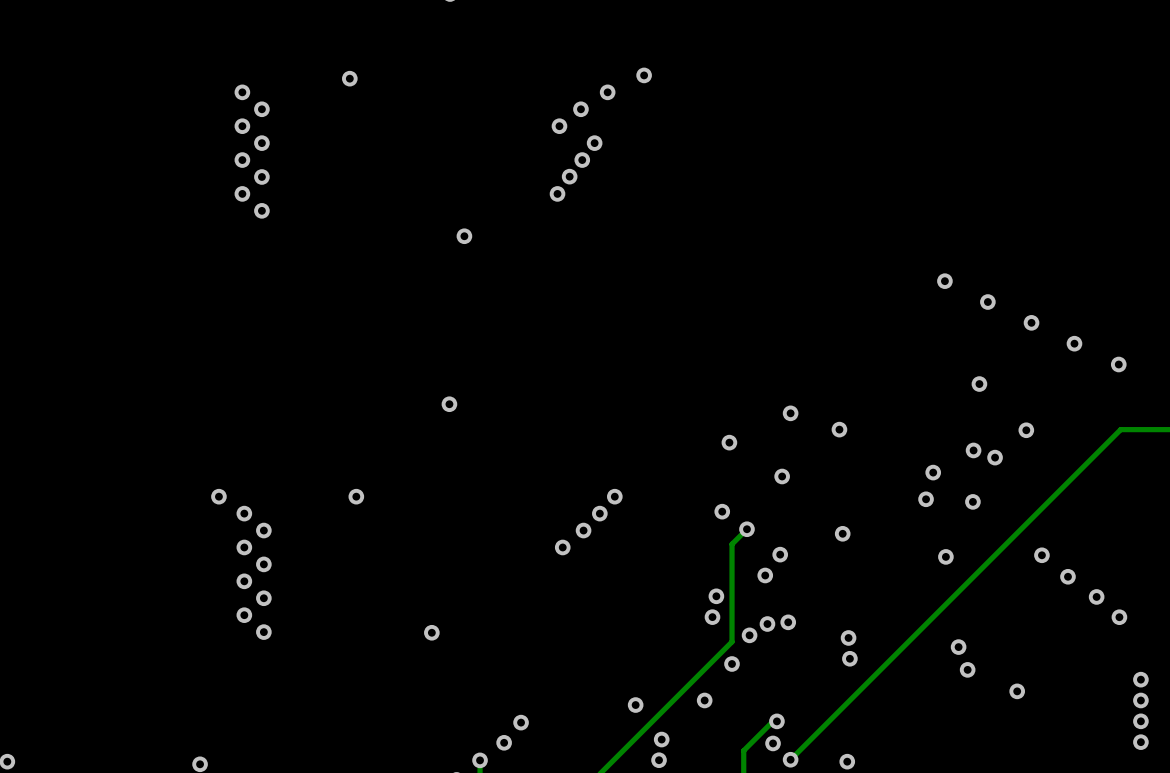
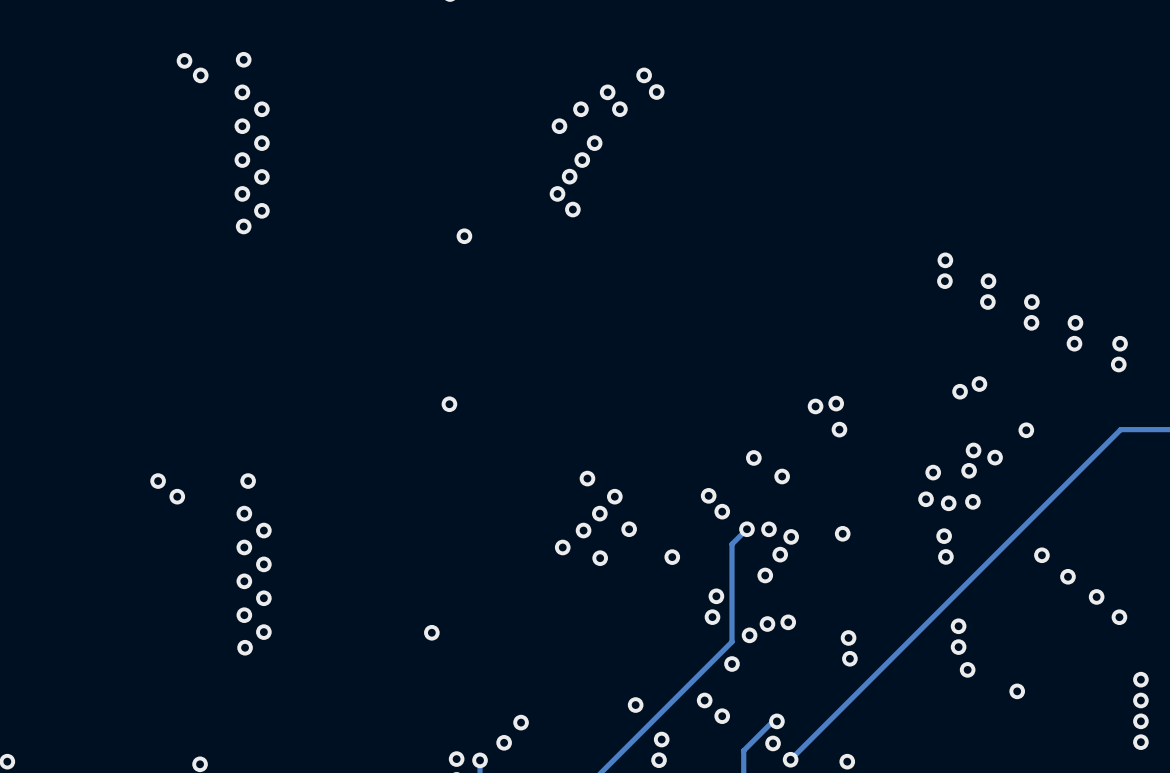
via: none -> (243, 59)
via: none -> (184, 60)
via: none -> (200, 75)
via: (349, 78) -> none
via: none -> (656, 92)
via: none -> (619, 109)
via: none -> (572, 209)
via: none -> (243, 226)
via: none -> (945, 260)
via: none -> (988, 281)
via: none -> (1031, 302)
via: none -> (1075, 322)
via: none -> (1120, 343)
via: none -> (960, 391)
via: none -> (836, 403)
via: none -> (815, 406)
via: (790, 413) -> none
via: (729, 442) -> none
via: none -> (753, 457)
via: none -> (969, 470)
via: none -> (587, 478)
via: none -> (158, 481)
via: none -> (248, 481)
via: none -> (708, 495)
via: none -> (177, 496)
via: (218, 496) -> none
via: (356, 496) -> none
via: none -> (948, 503)
via: none -> (629, 529)
via: none -> (768, 529)
via: none -> (791, 536)
via: none -> (944, 536)
via: none -> (672, 557)
via: none -> (600, 558)
via: none -> (958, 626)
via: none -> (245, 647)
via: none -> (722, 716)
via: none -> (456, 759)

